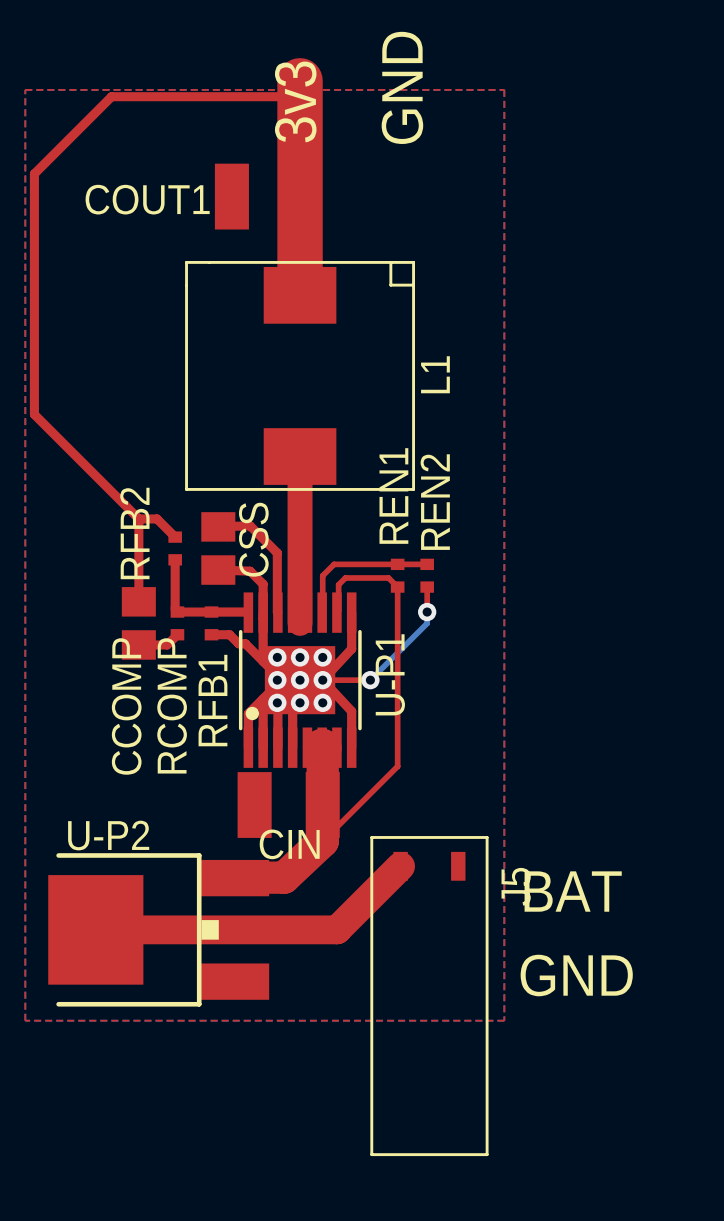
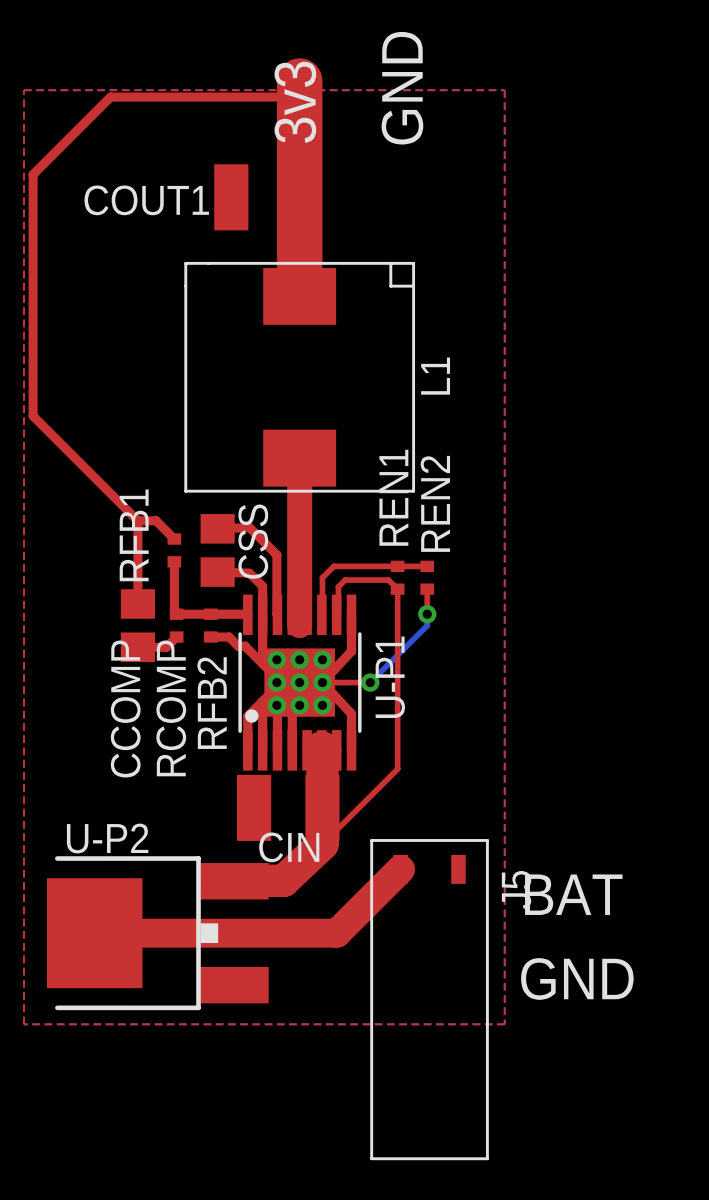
RFB2 name: RFB2 (134, 533) -> RFB1 (134, 535)
RFB1 name: RFB1 (212, 700) -> RFB2 (212, 703)

